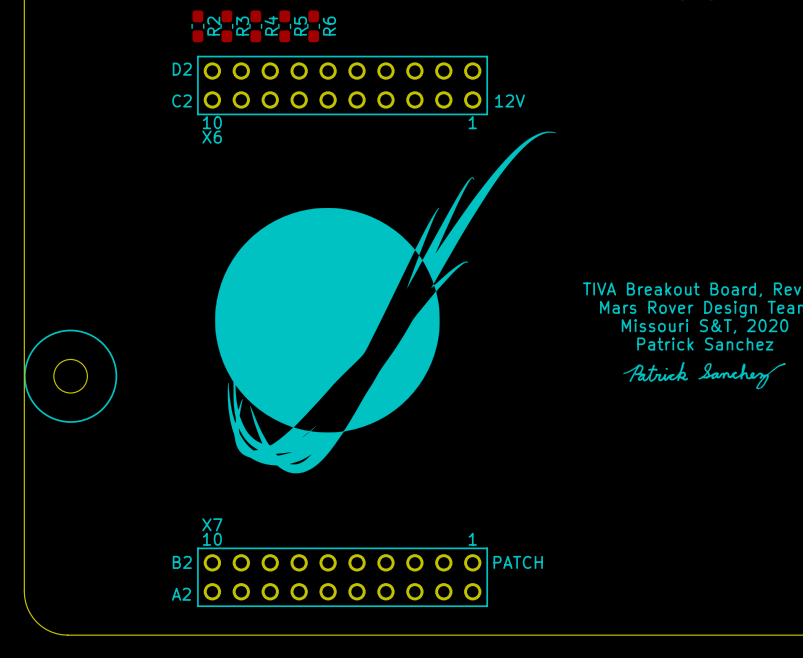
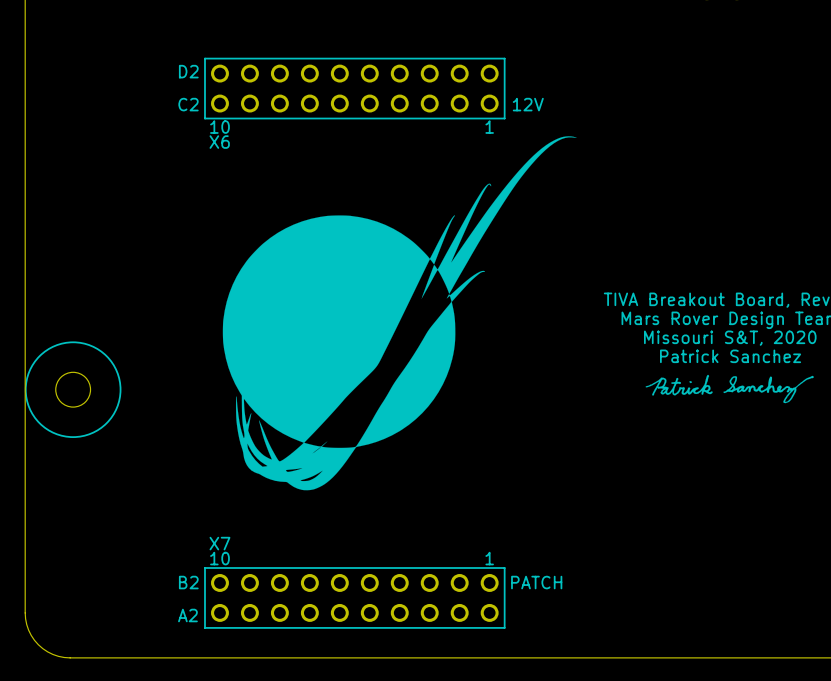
R2: (197, 26) -> none
R3: (226, 26) -> none
R4: (255, 26) -> none
R5: (284, 26) -> none
R6: (313, 26) -> none

